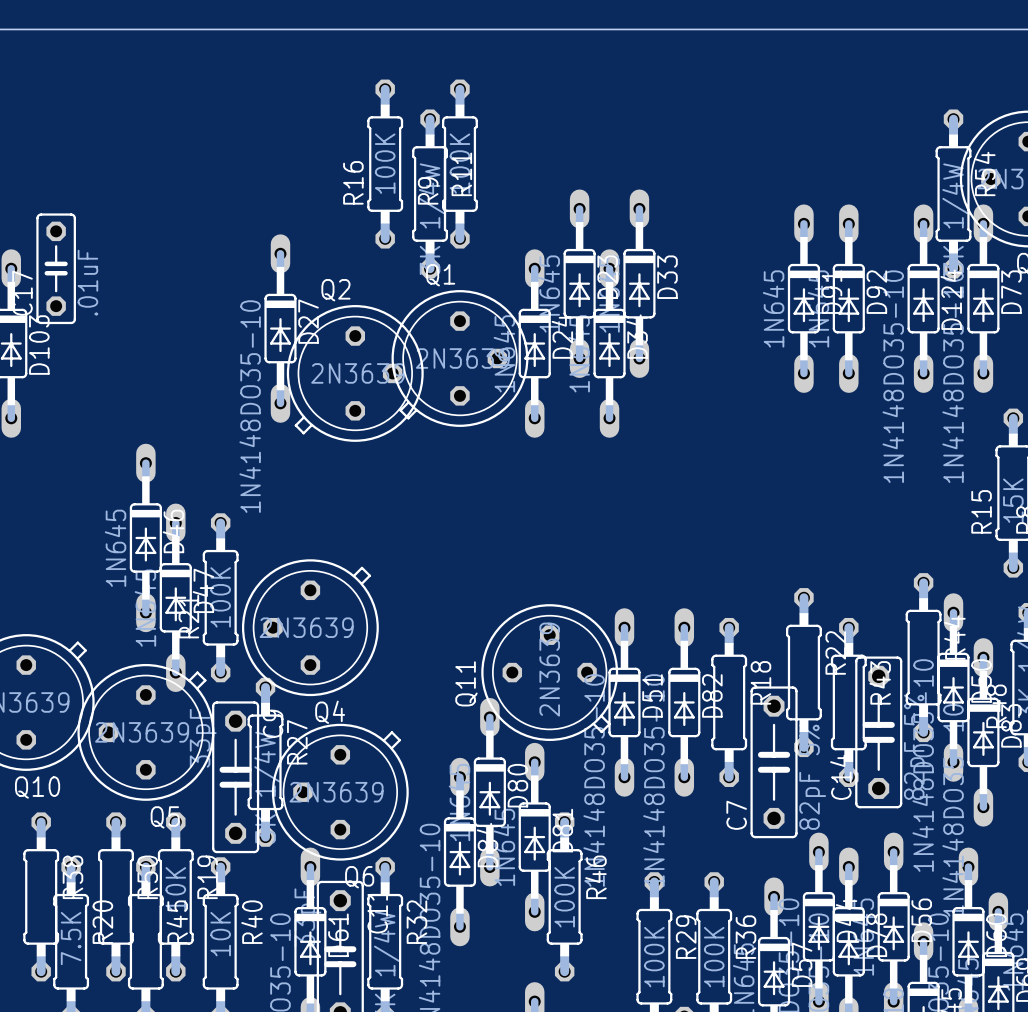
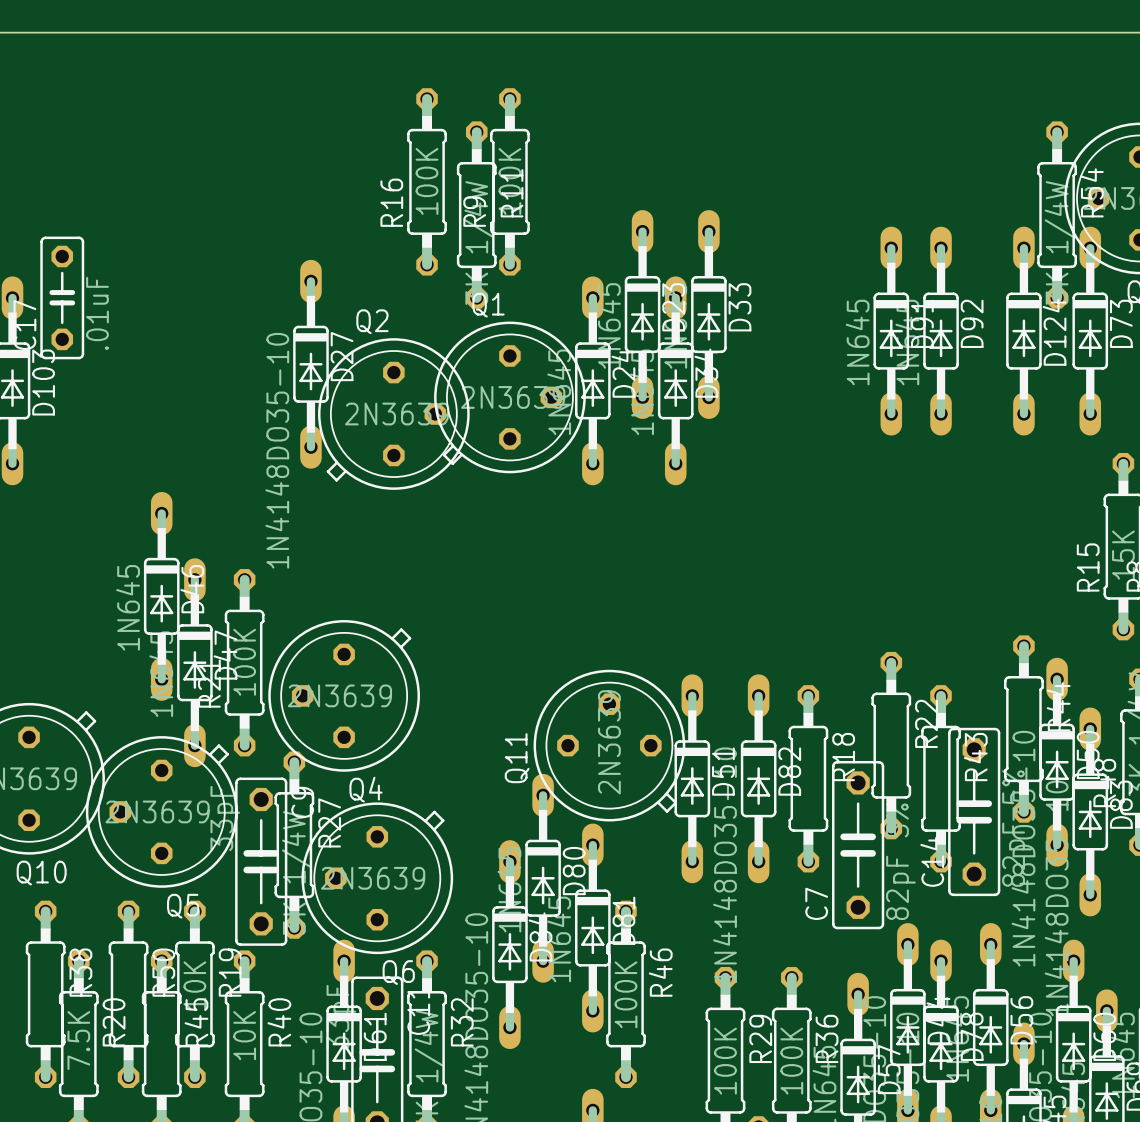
D124 value: 1N4148DO35-10 (893, 376) -> none
D73 value: 1N4148DO35-10 (953, 376) -> none
D51 value: 1N4148DO35-10 (594, 780) -> none

